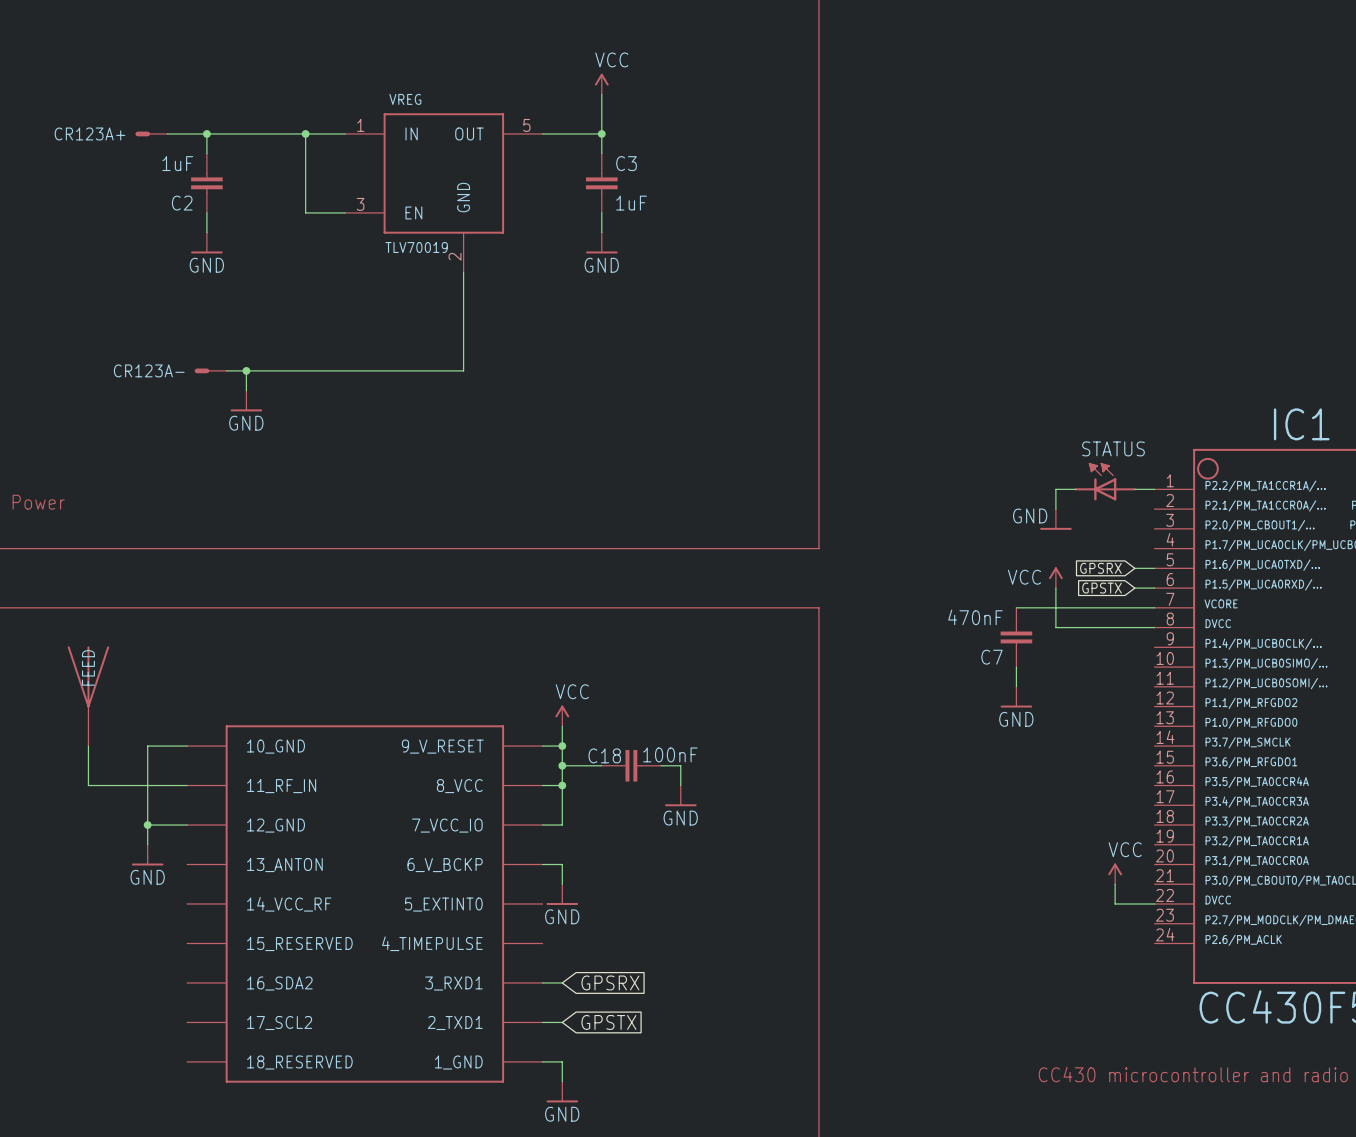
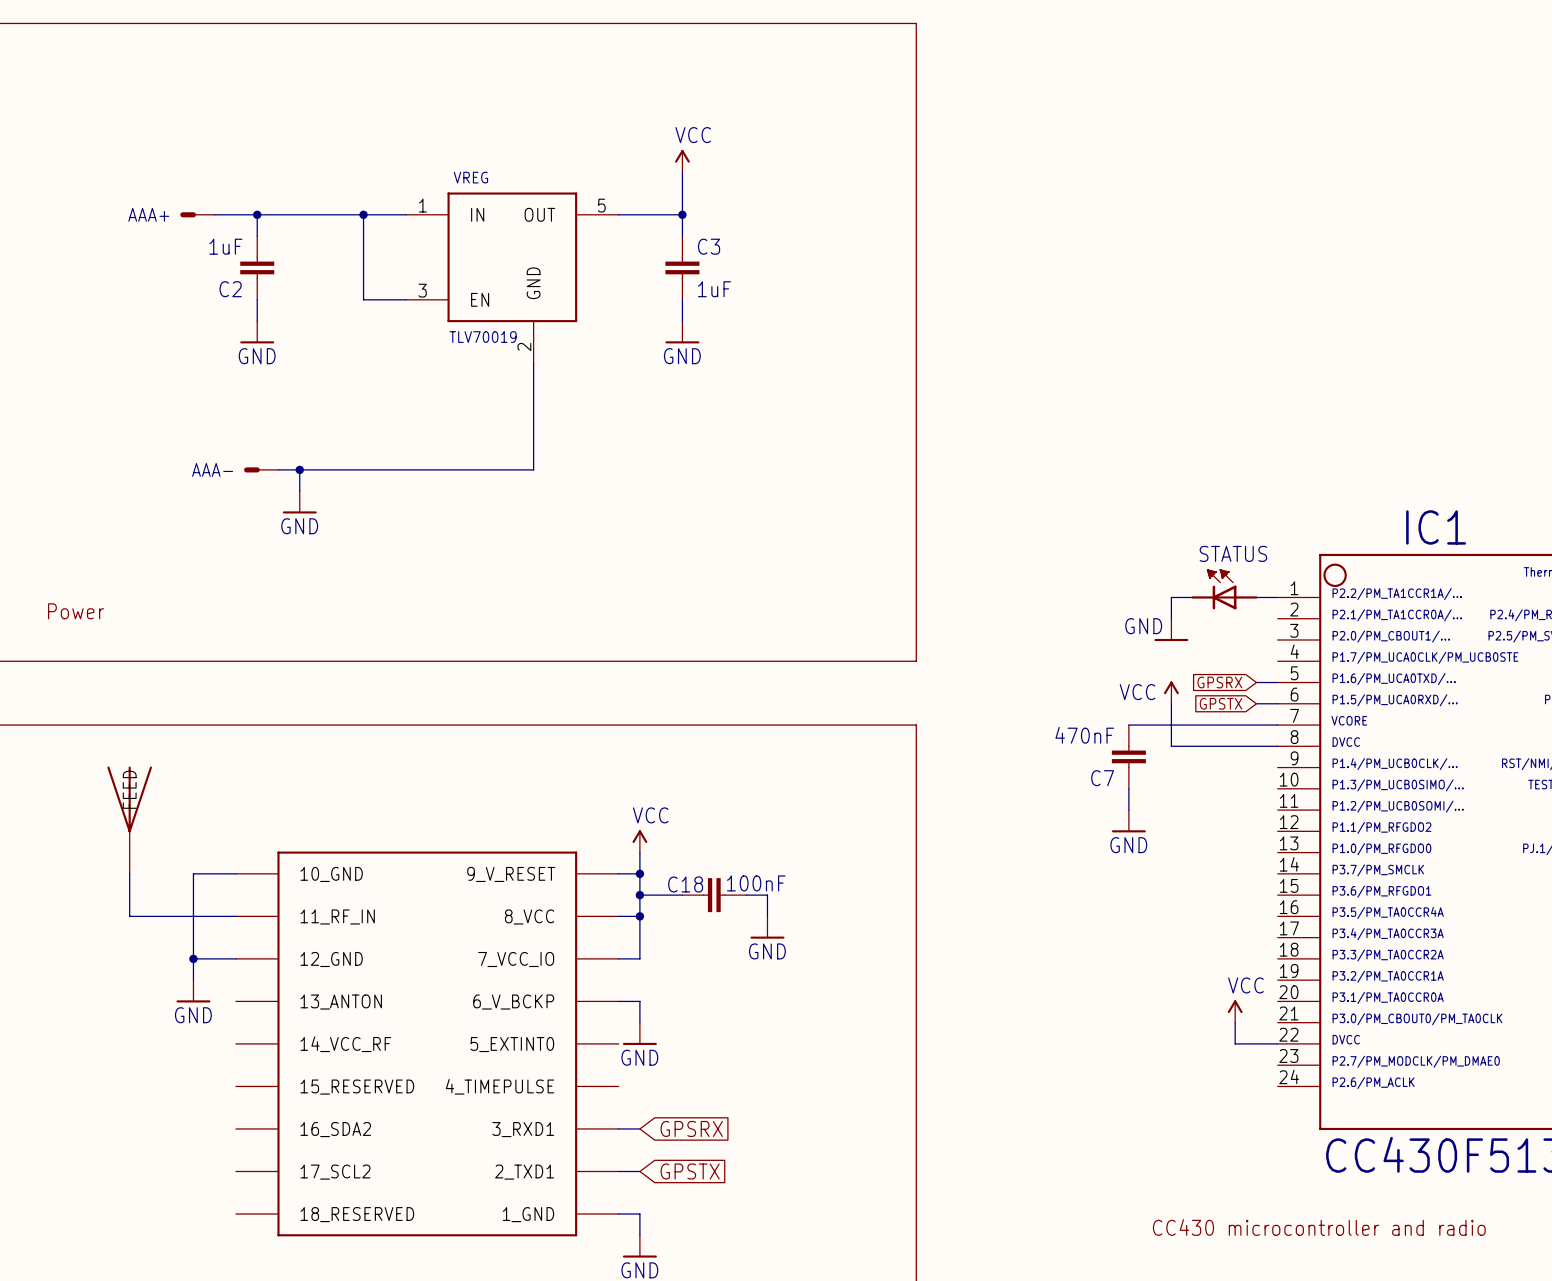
CR123A+ name: CR123A+ (89, 133) -> AAA+ (148, 214)
CR123A- name: CR123A- (149, 370) -> AAA- (212, 469)

